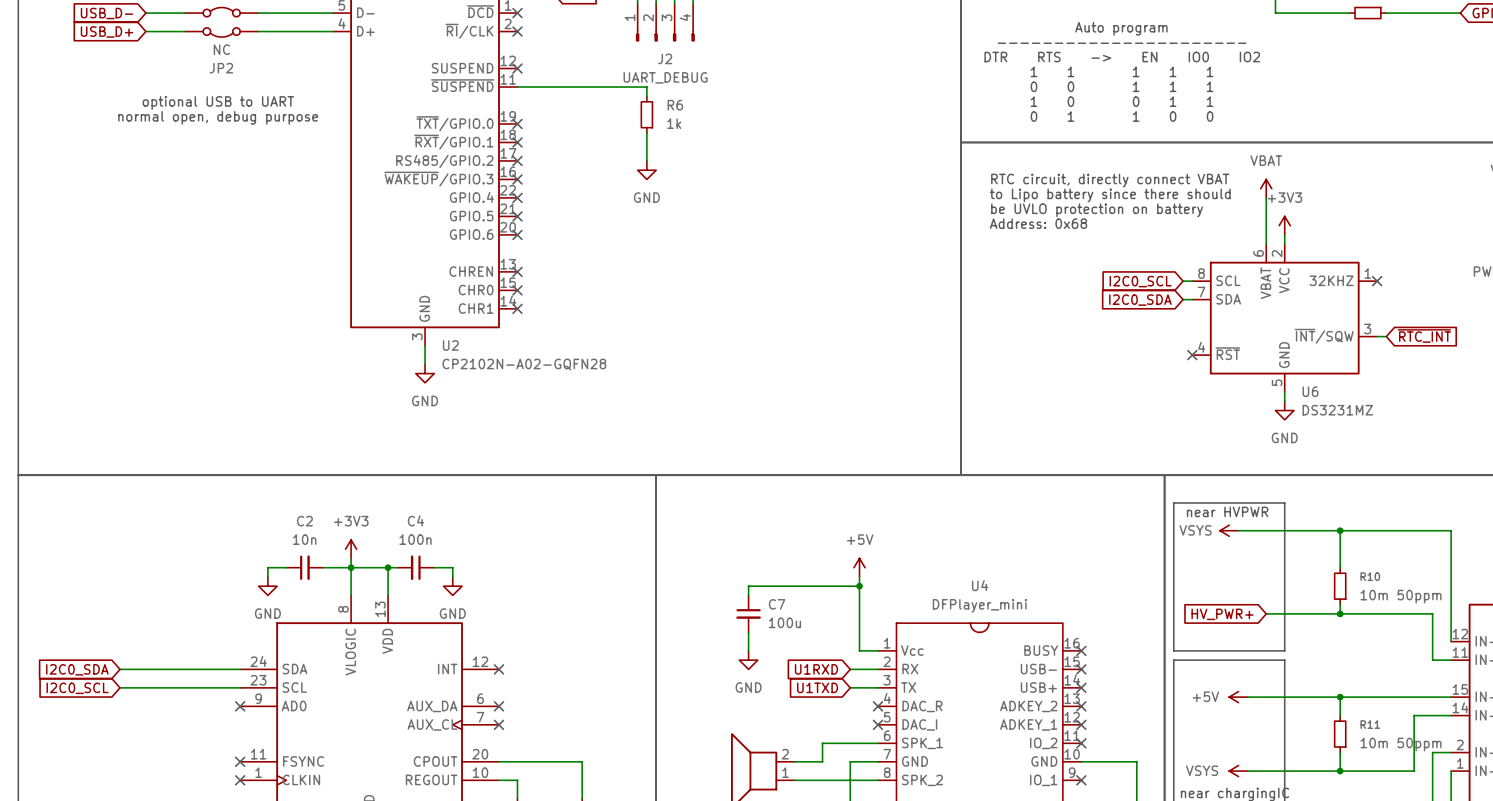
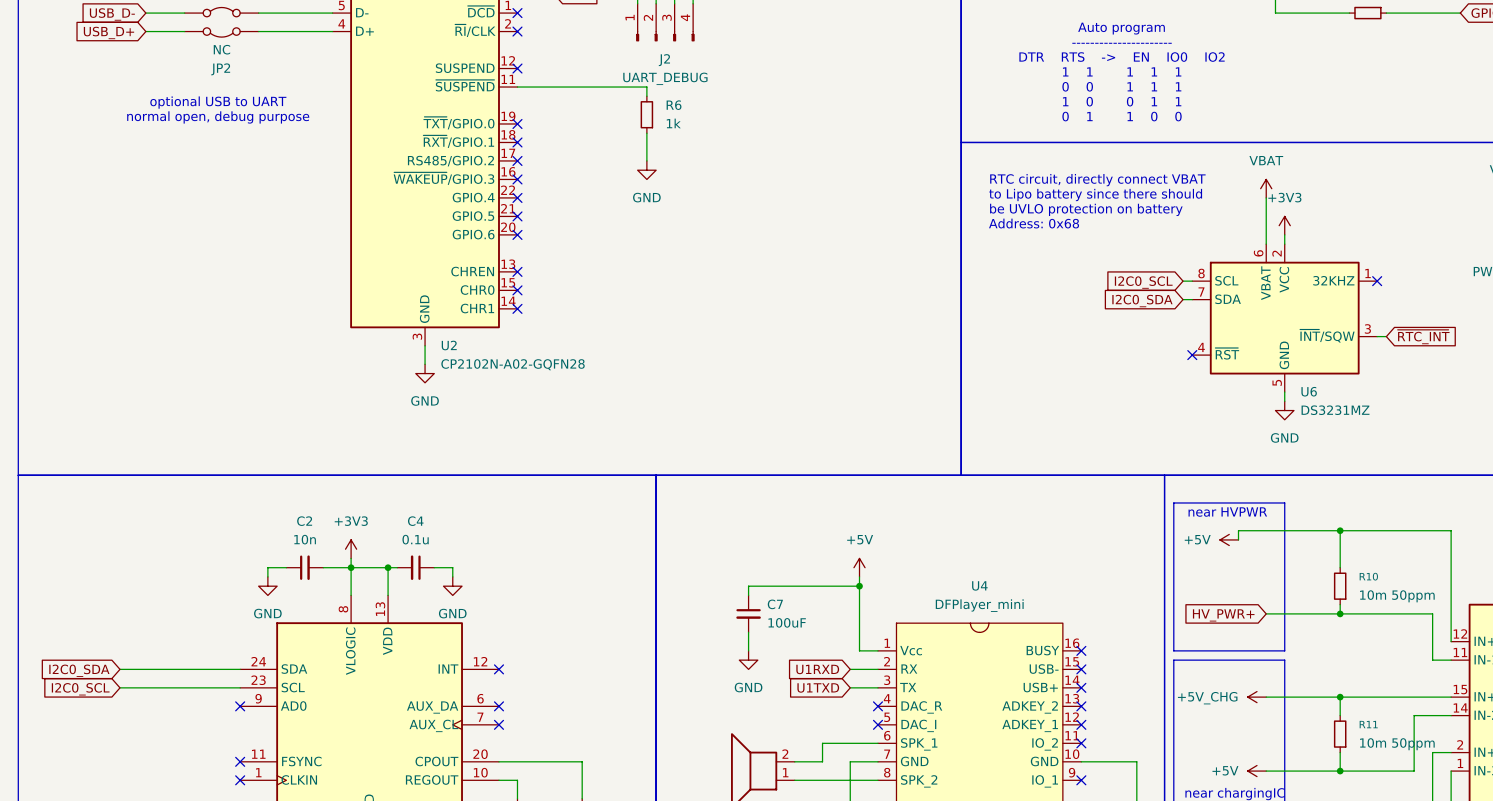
power symbol: VSYS (1229, 530) -> none
wire: none -> (1238, 530) (1238, 539)
C4 value: 100n (415, 539) -> 0.1u (415, 539)
power symbol: none -> +5V (1229, 539)
C7 value: 100u (784, 622) -> 100uF (787, 622)
power symbol position: +5V (1238, 697) -> +5V (1256, 771)
power symbol: none -> +5V_CHG (1256, 697)
power symbol: VSYS (1238, 771) -> none

